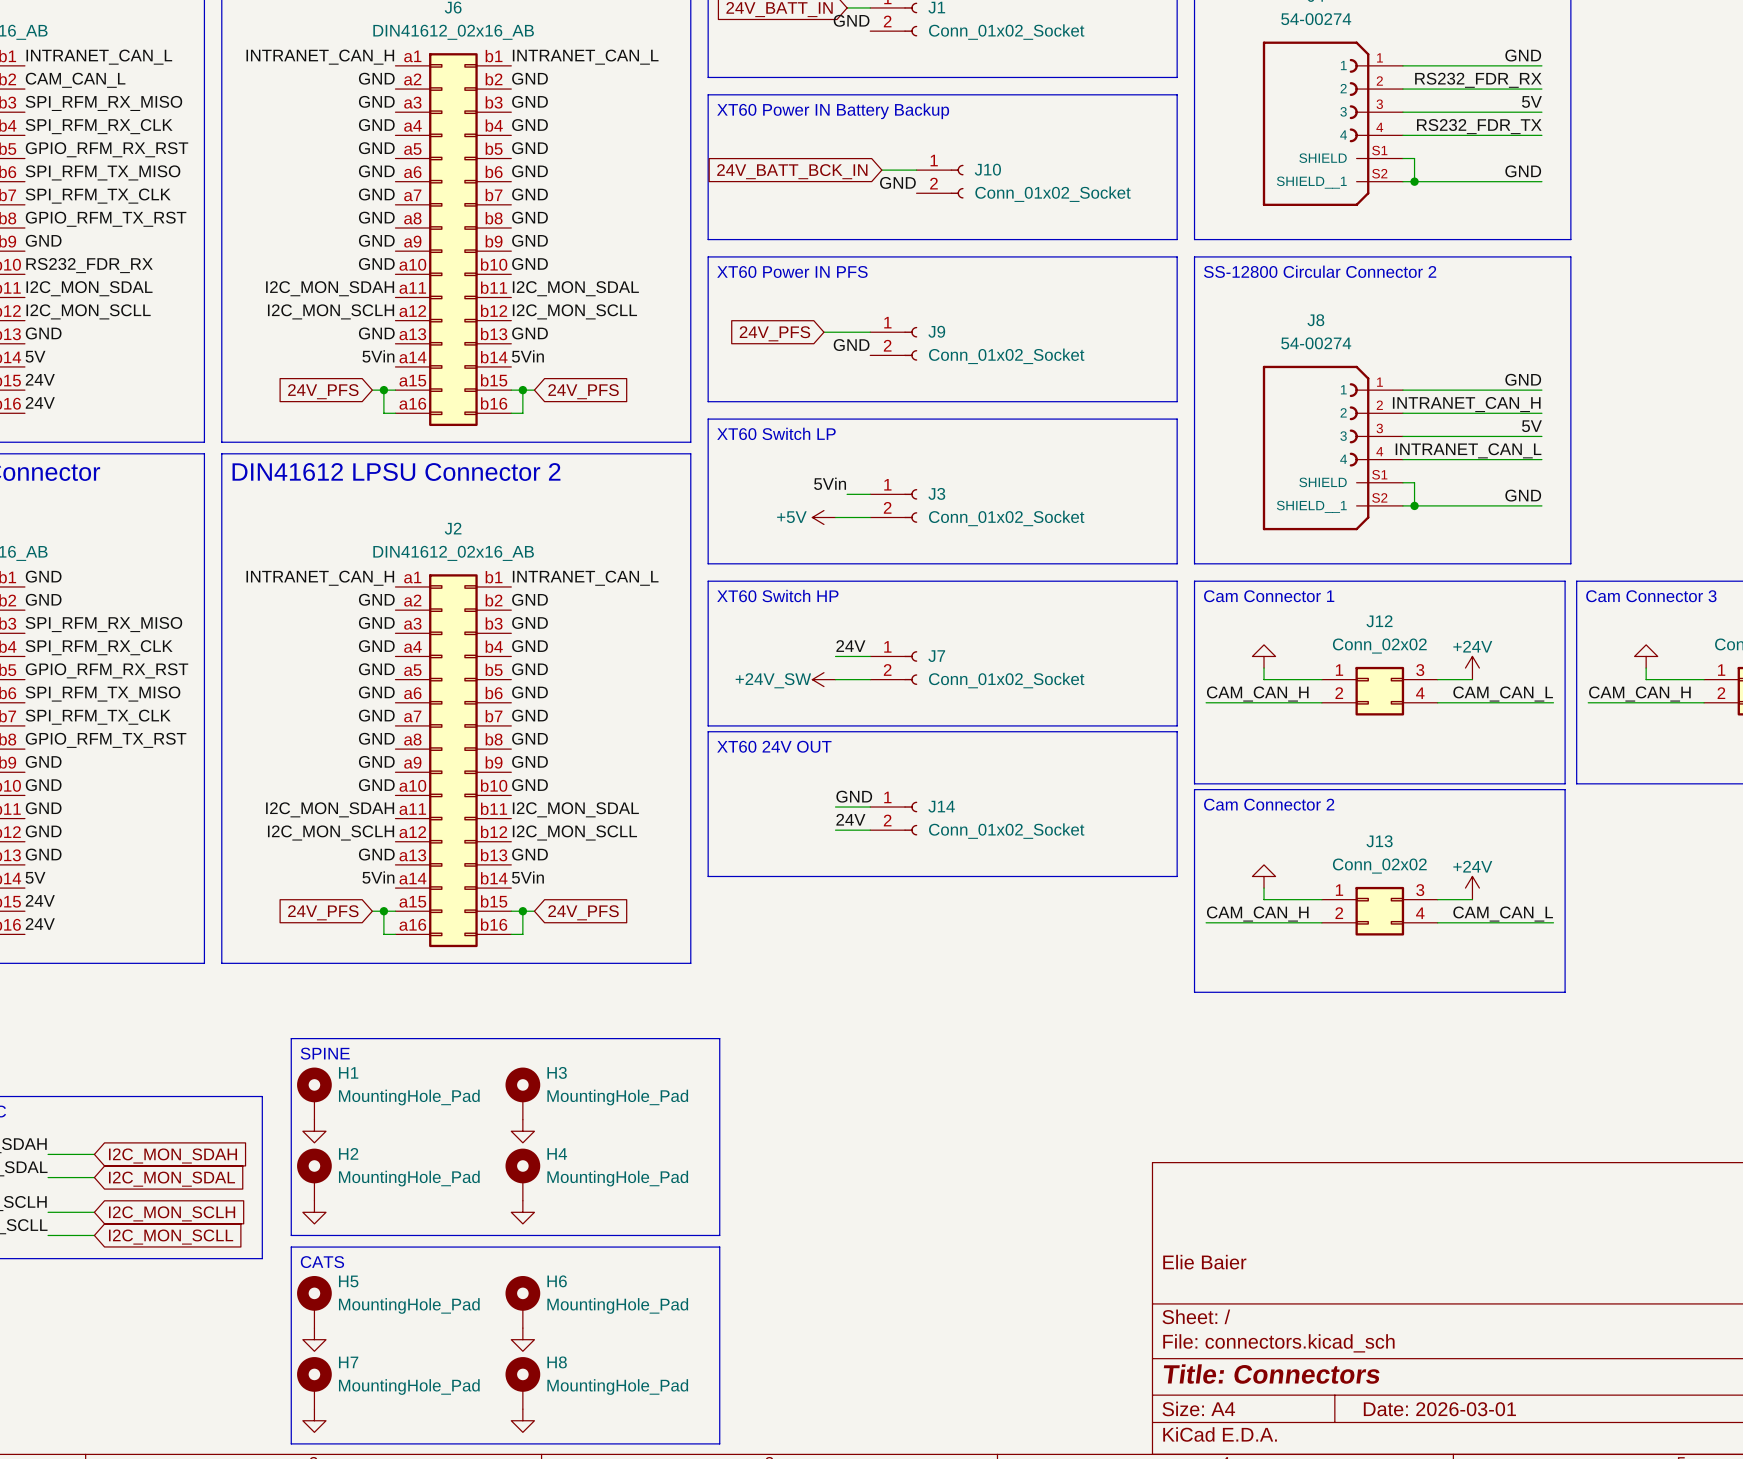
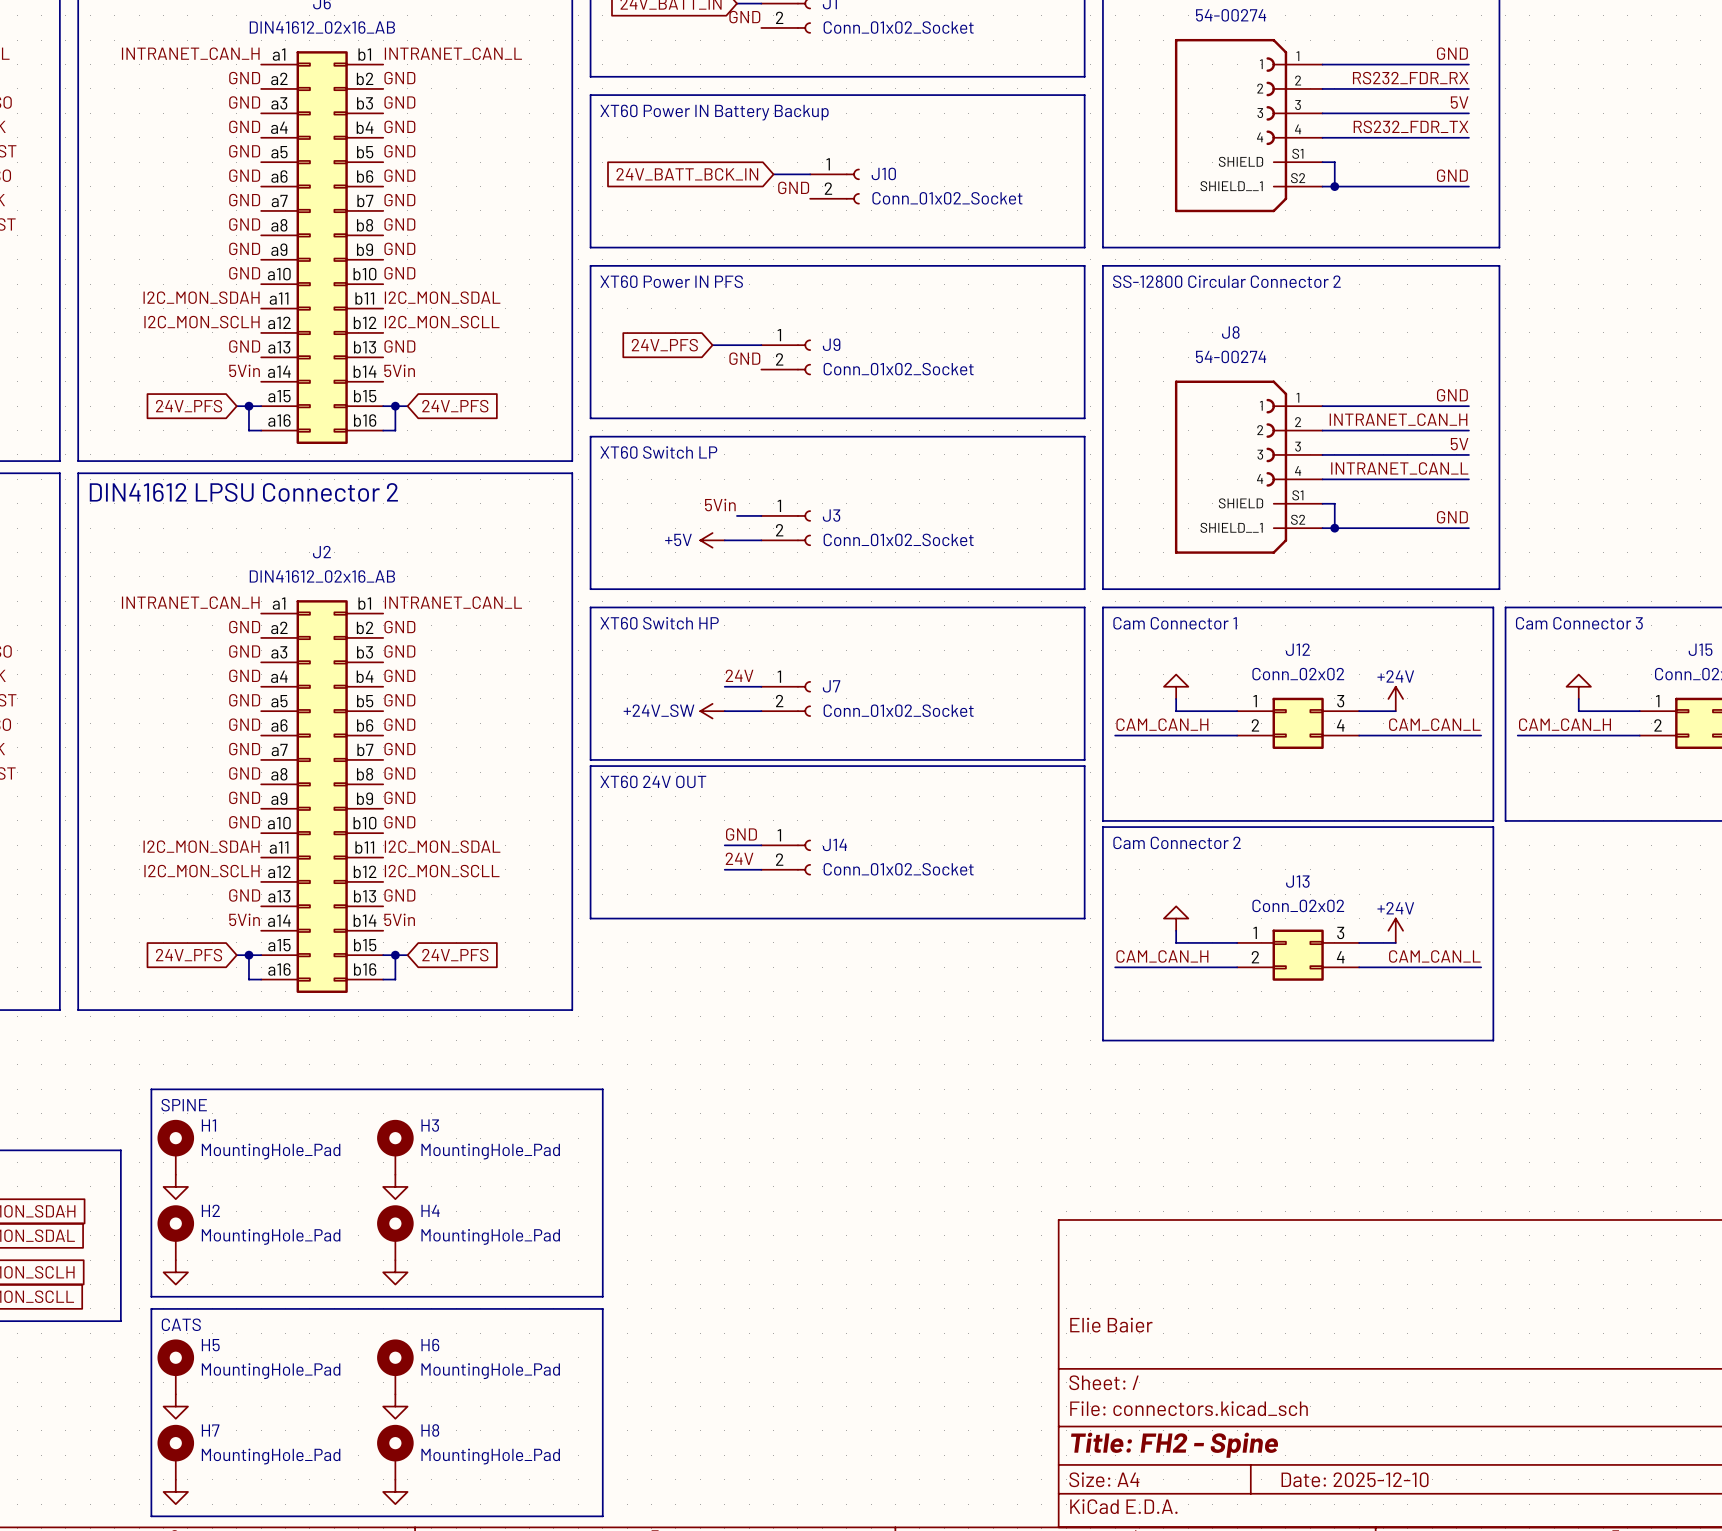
title block: Title: Connectors (1271, 1374) -> Title: FH2 - Spine (1174, 1445)
title block: Date: 2026-03-01 (1439, 1409) -> Date: 2025-12-10 (1355, 1479)

